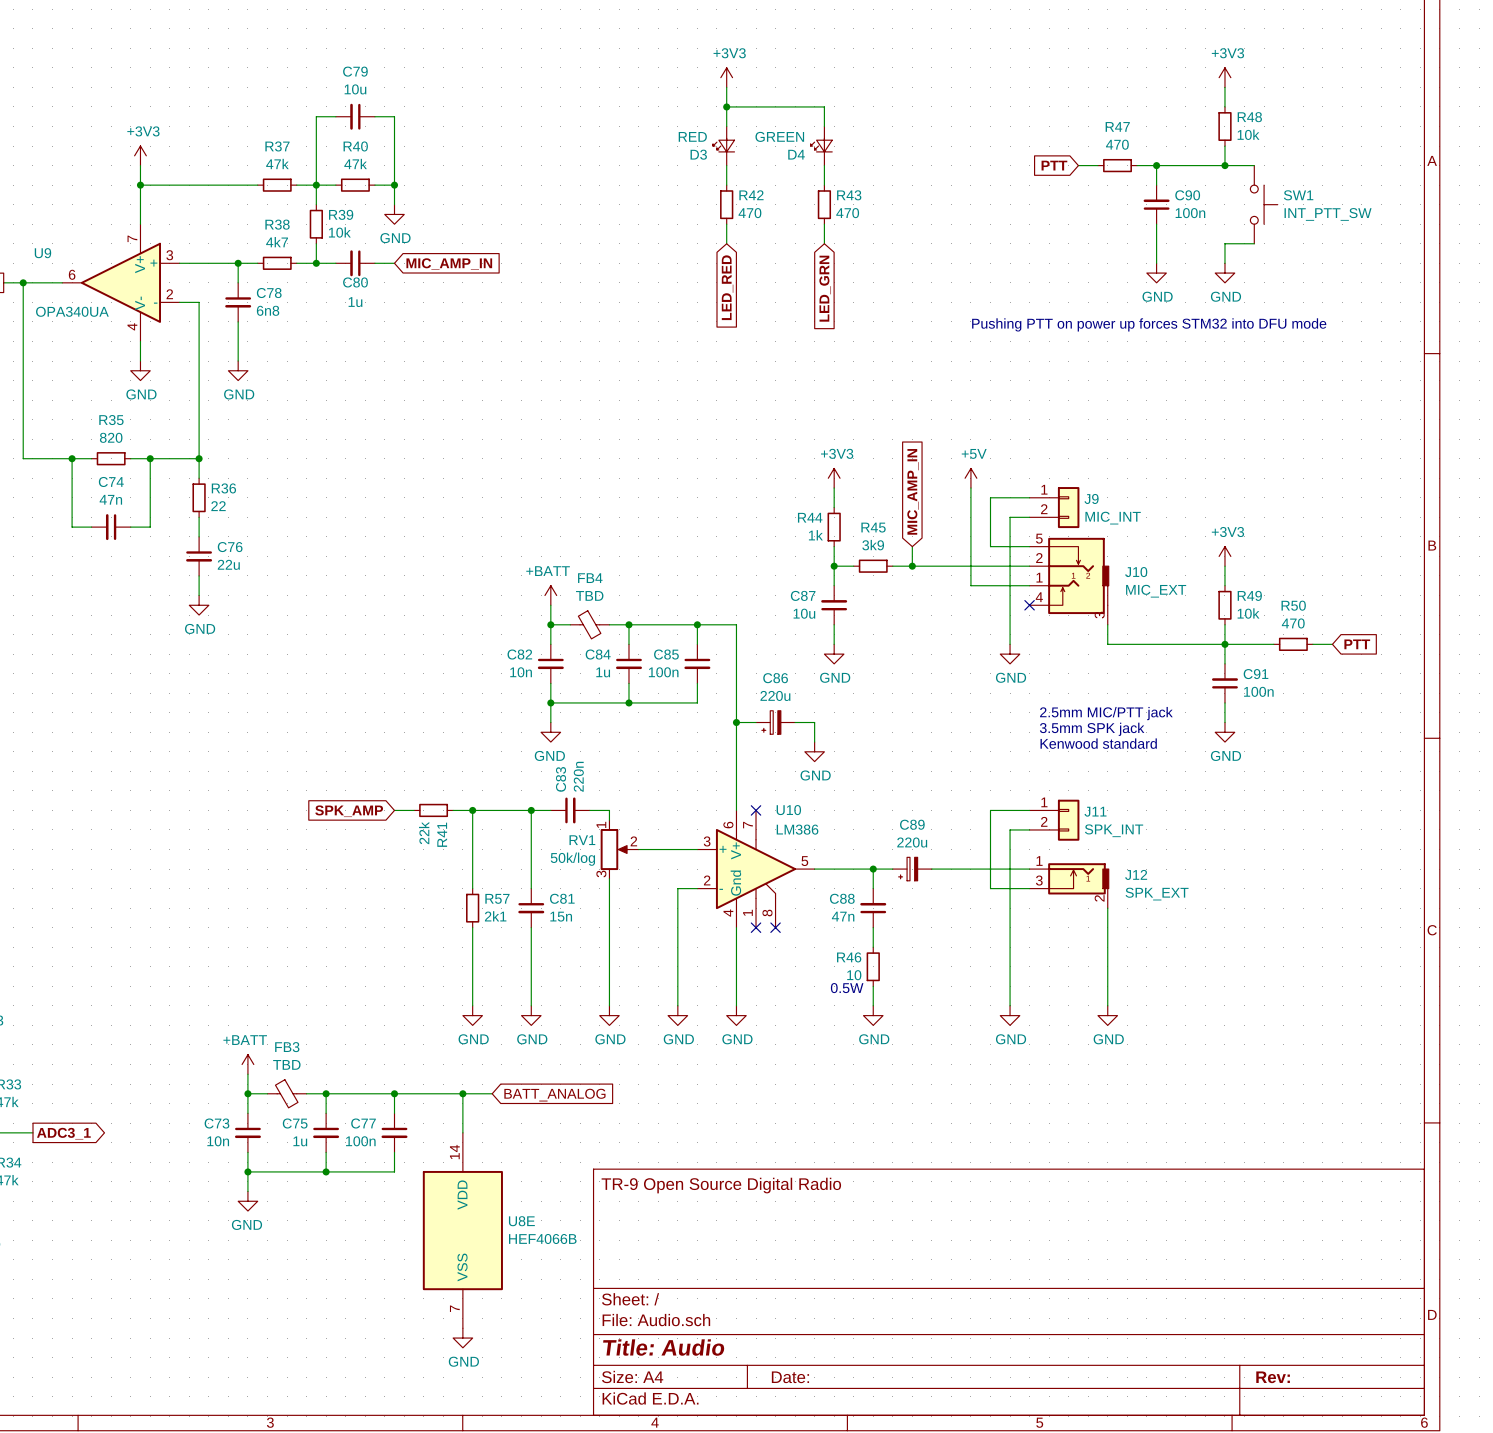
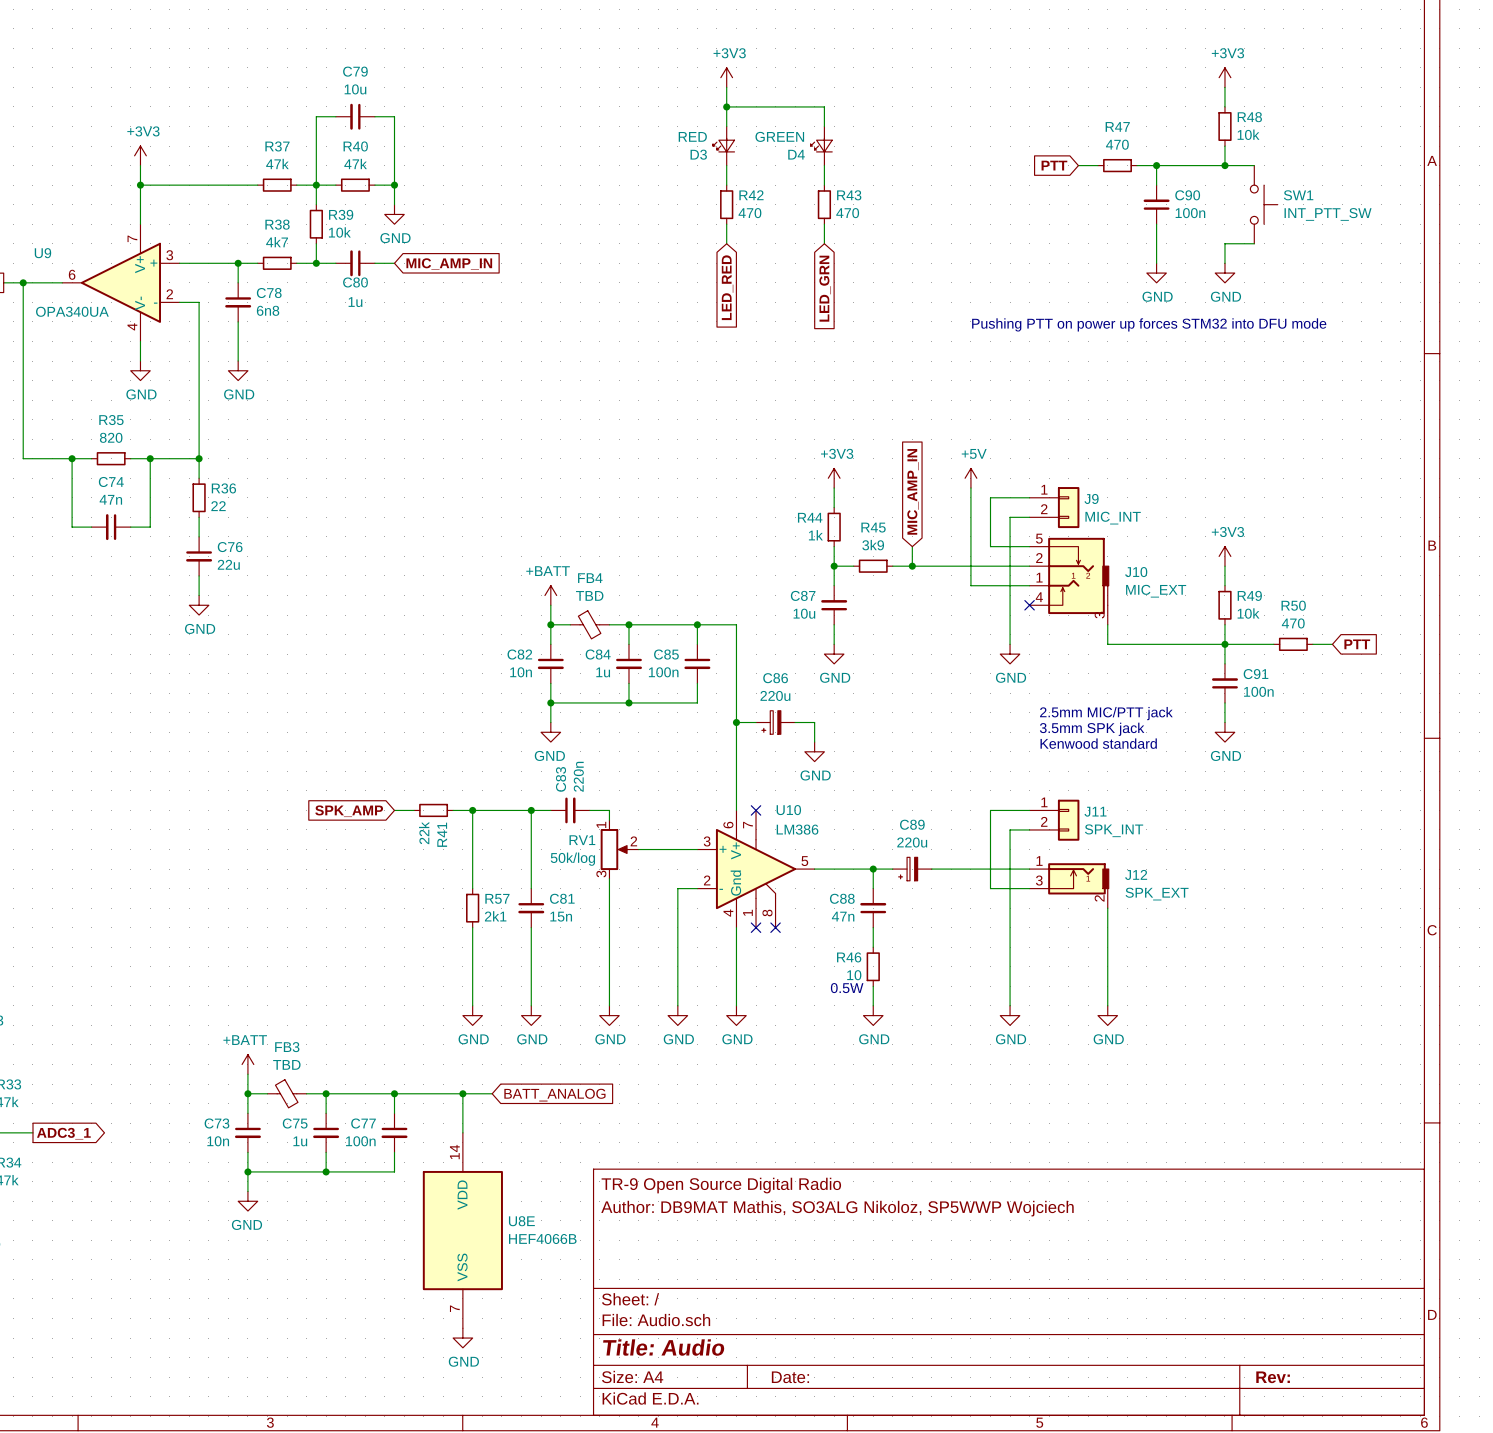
title block: none -> Author: DB9MAT Mathis, SO3ALG Nikoloz, SP5WWP Wojciech (837, 1208)

